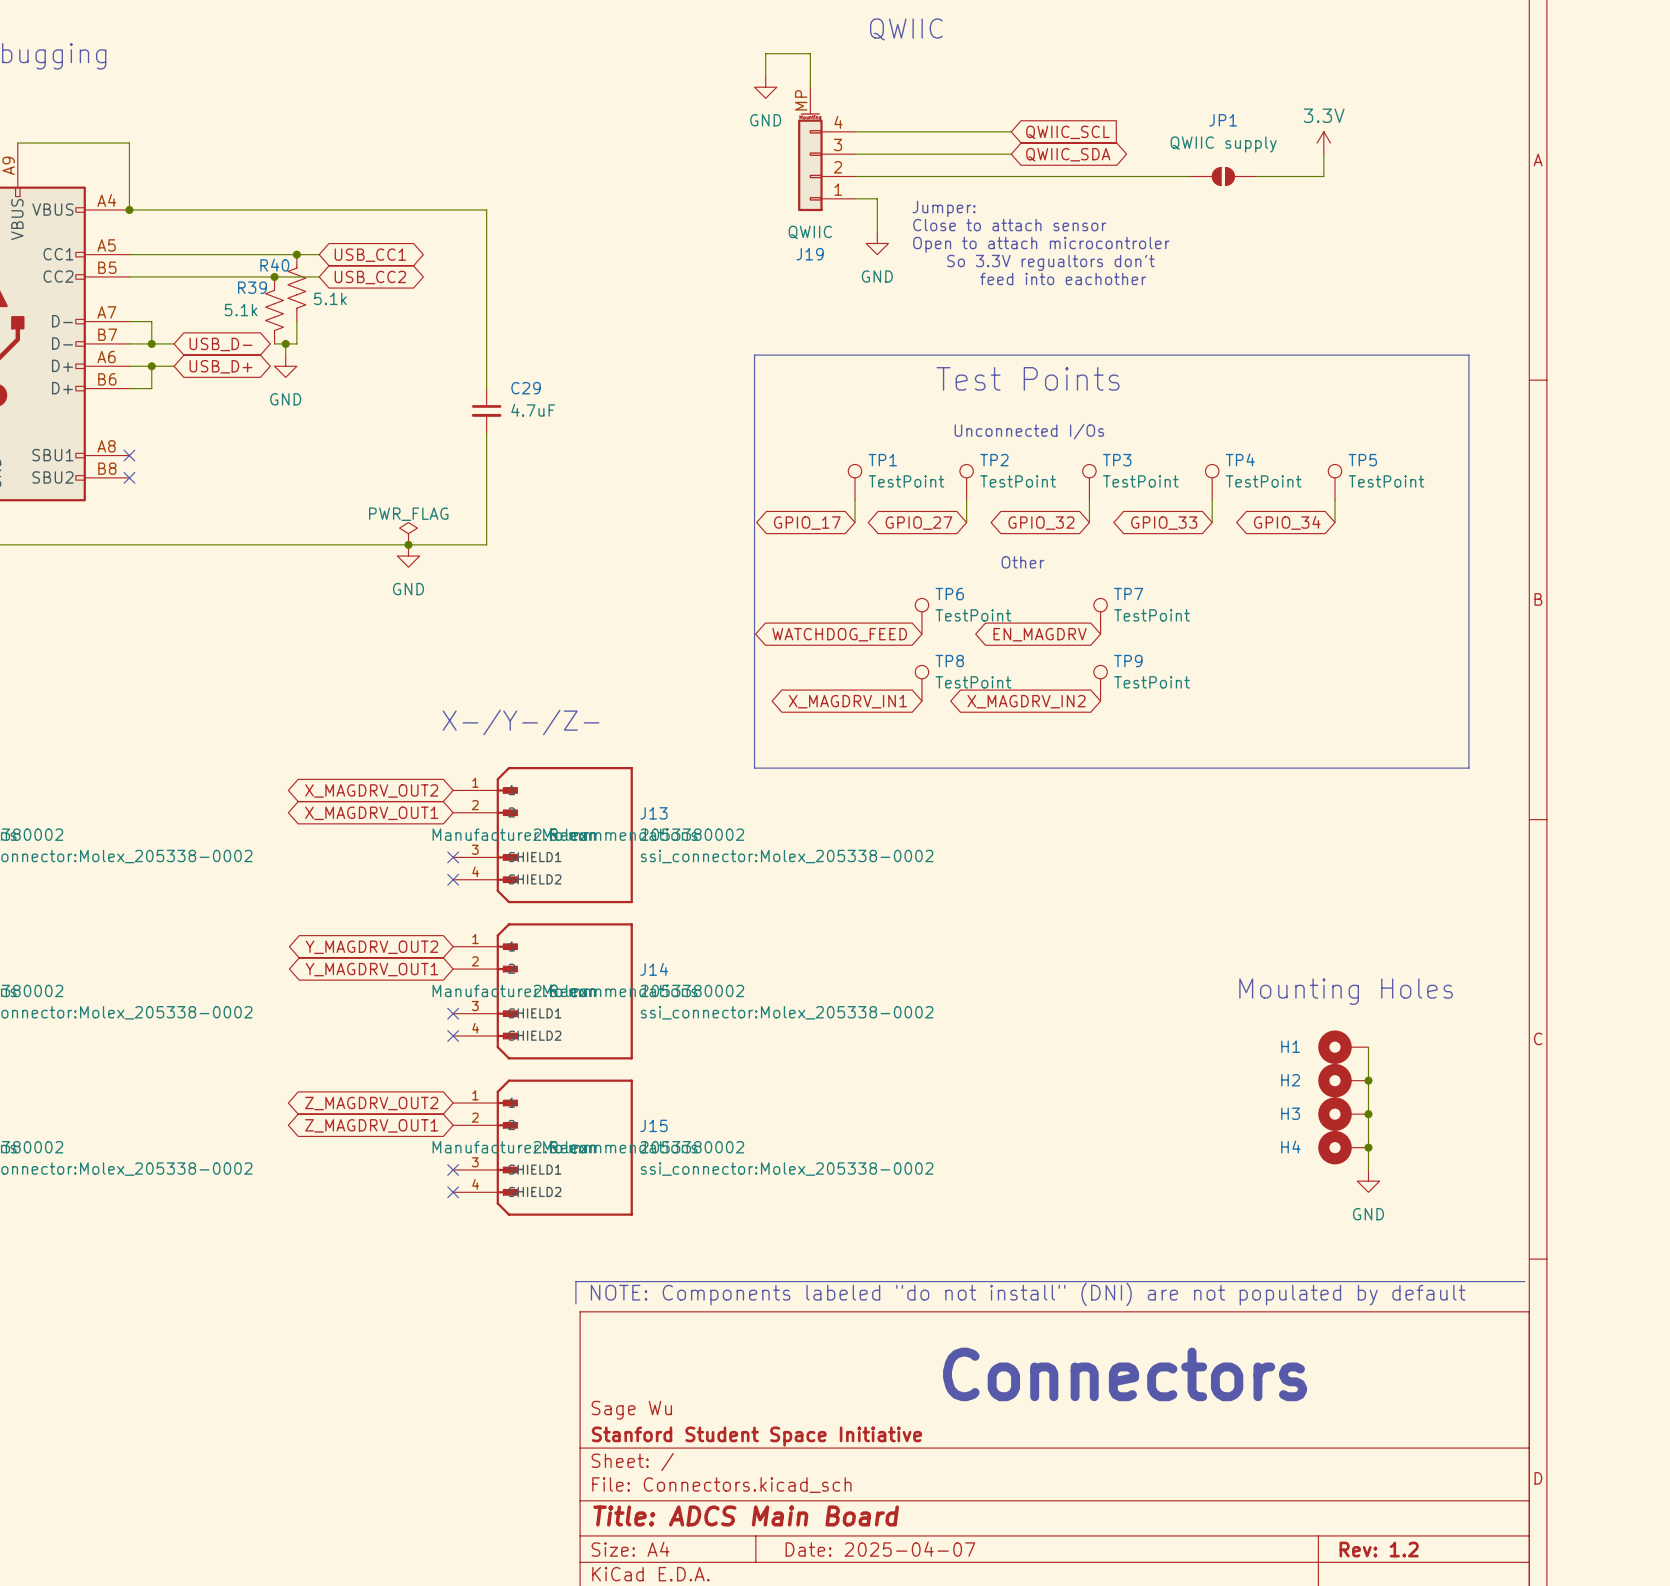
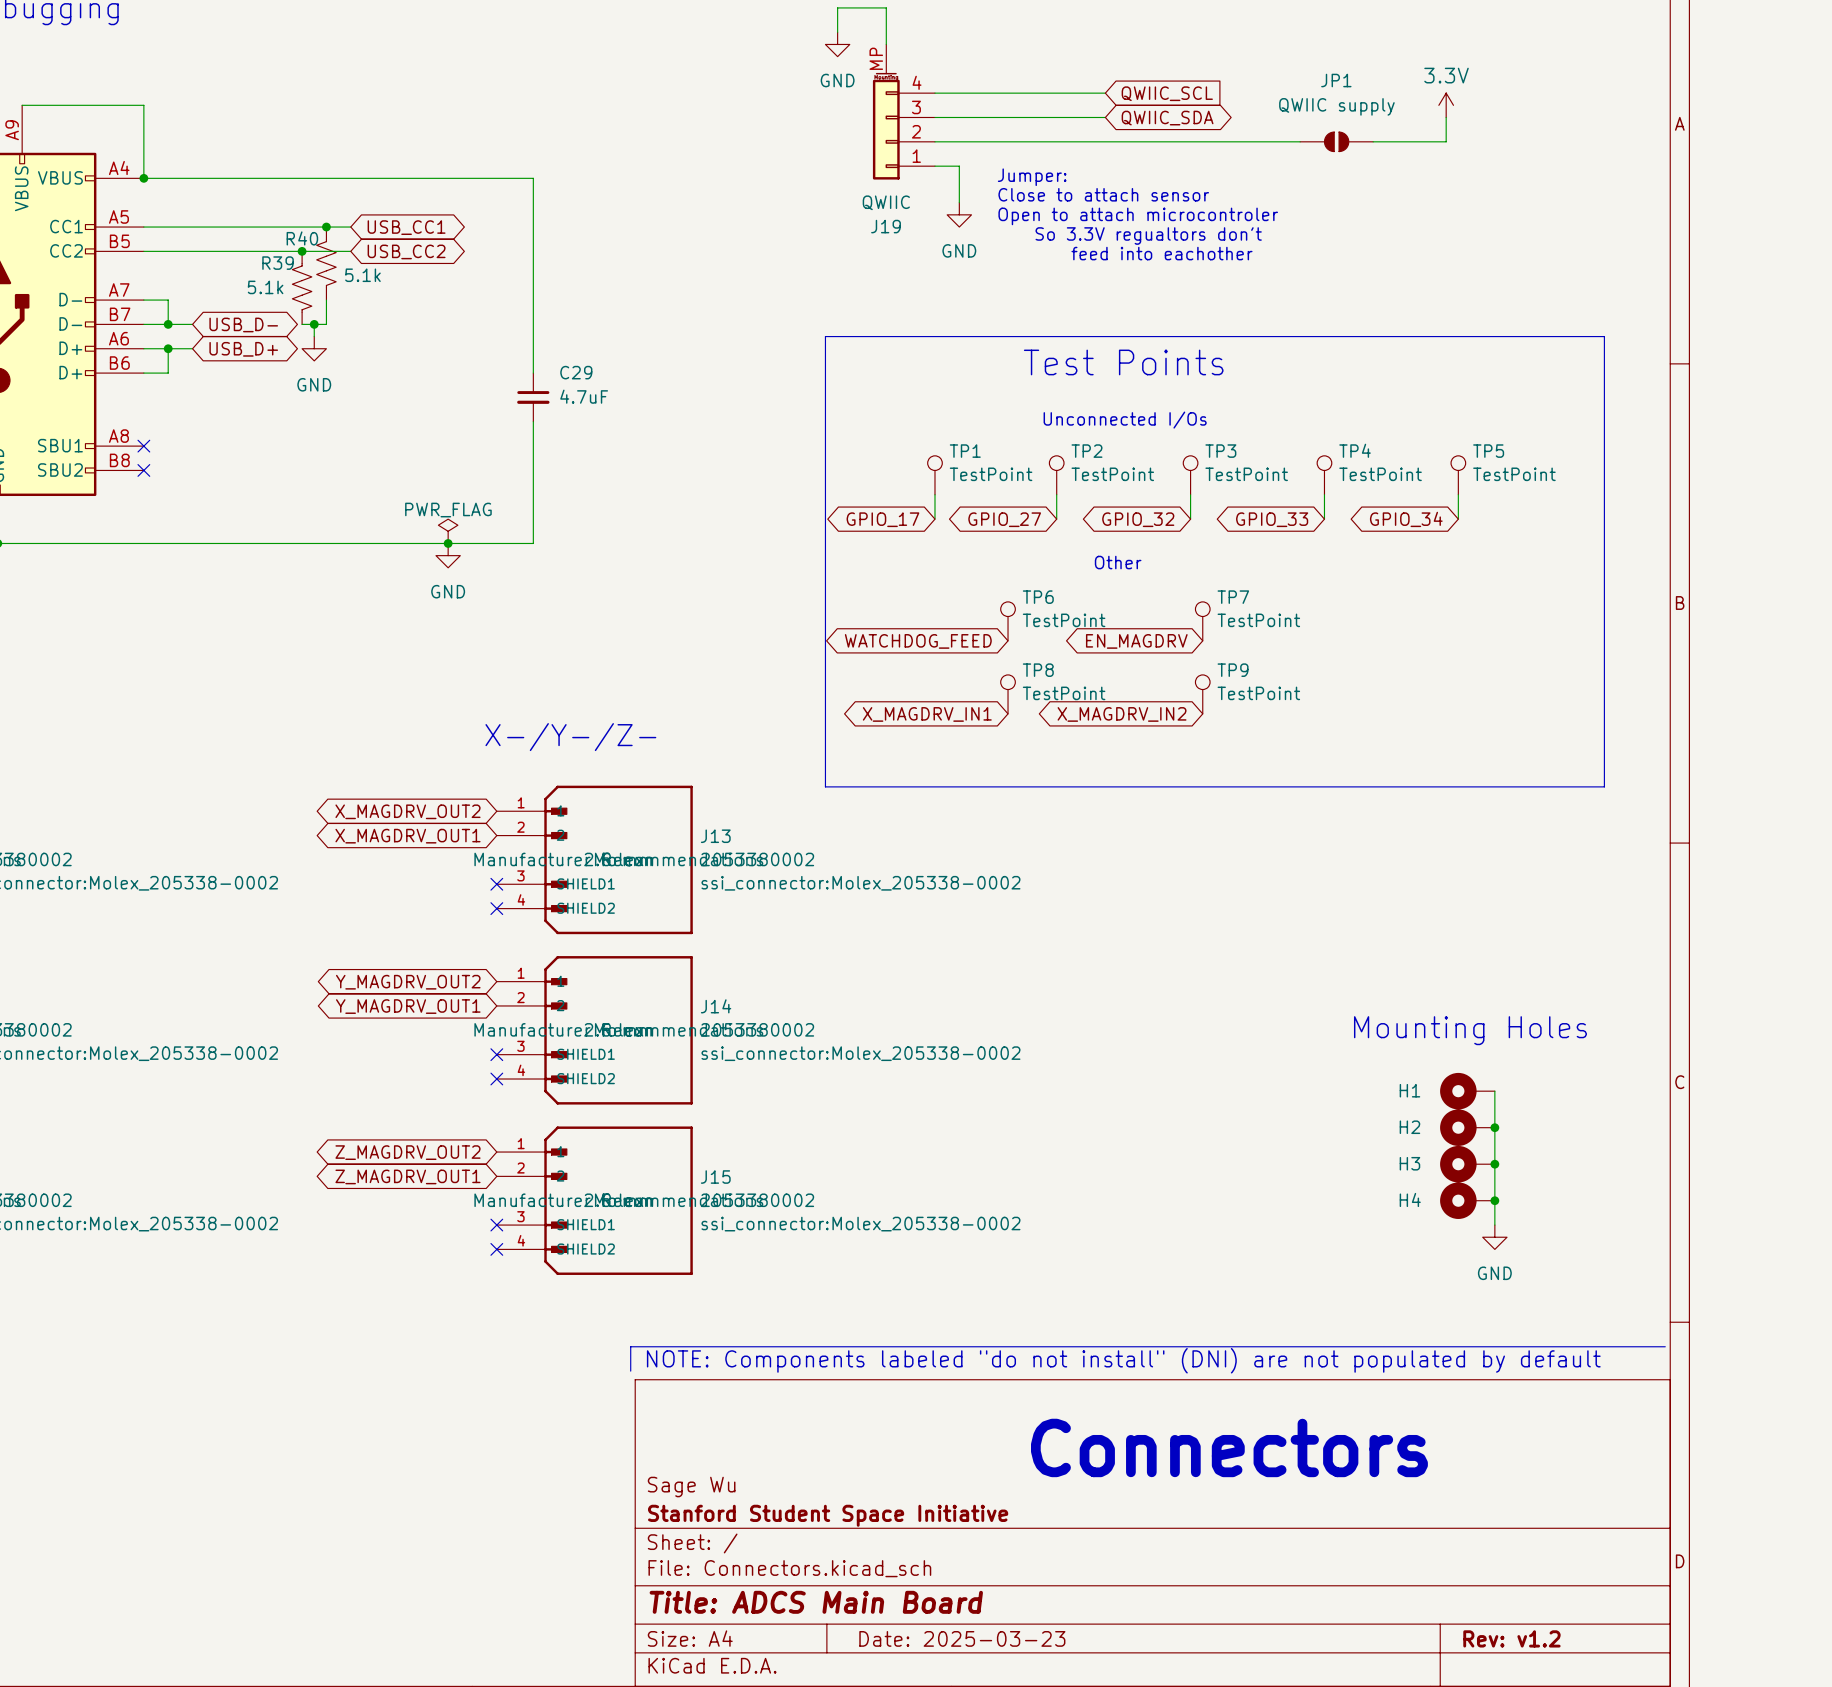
title block: Date: 2025-04-07 (880, 1549) -> Date: 2025-03-23 (962, 1638)
title block: Rev: 1.2 (1379, 1549) -> Rev: v1.2 (1511, 1638)

